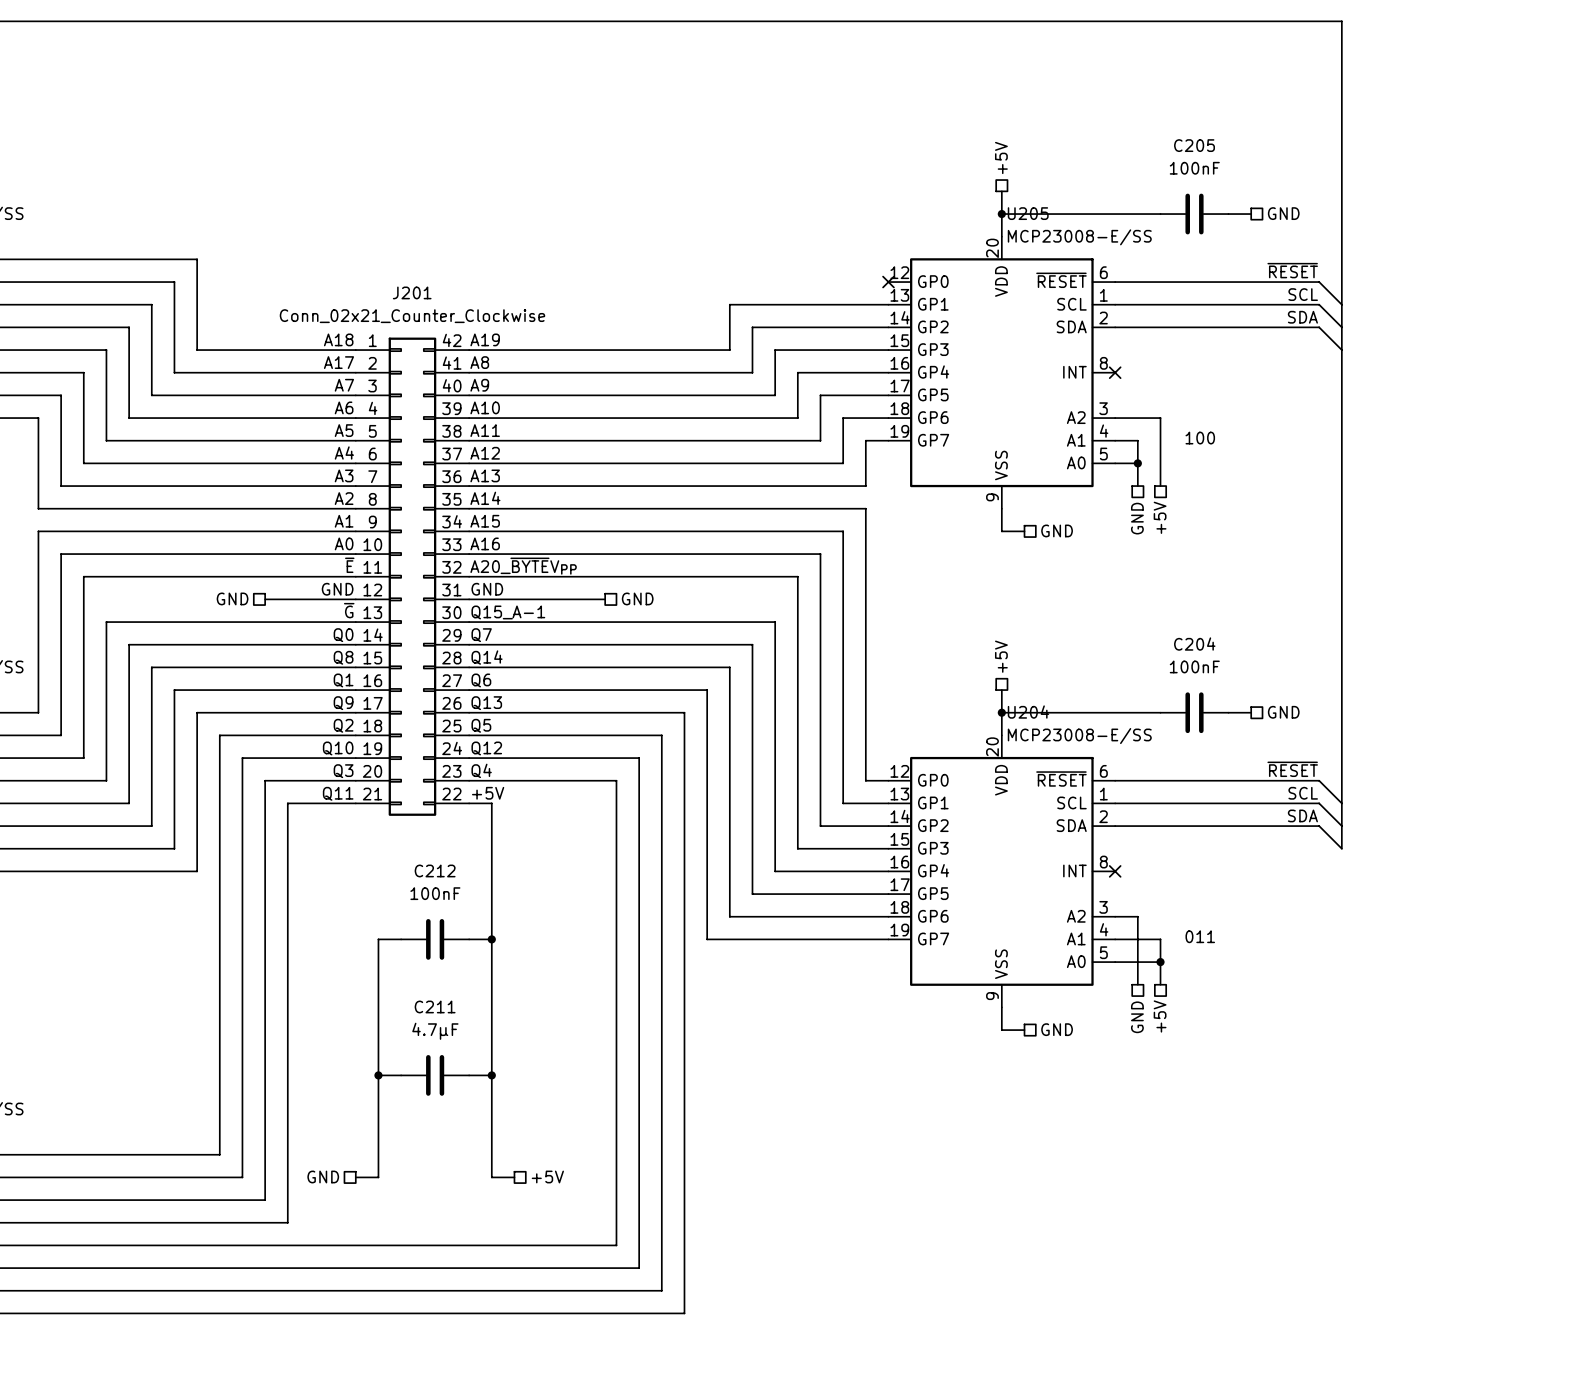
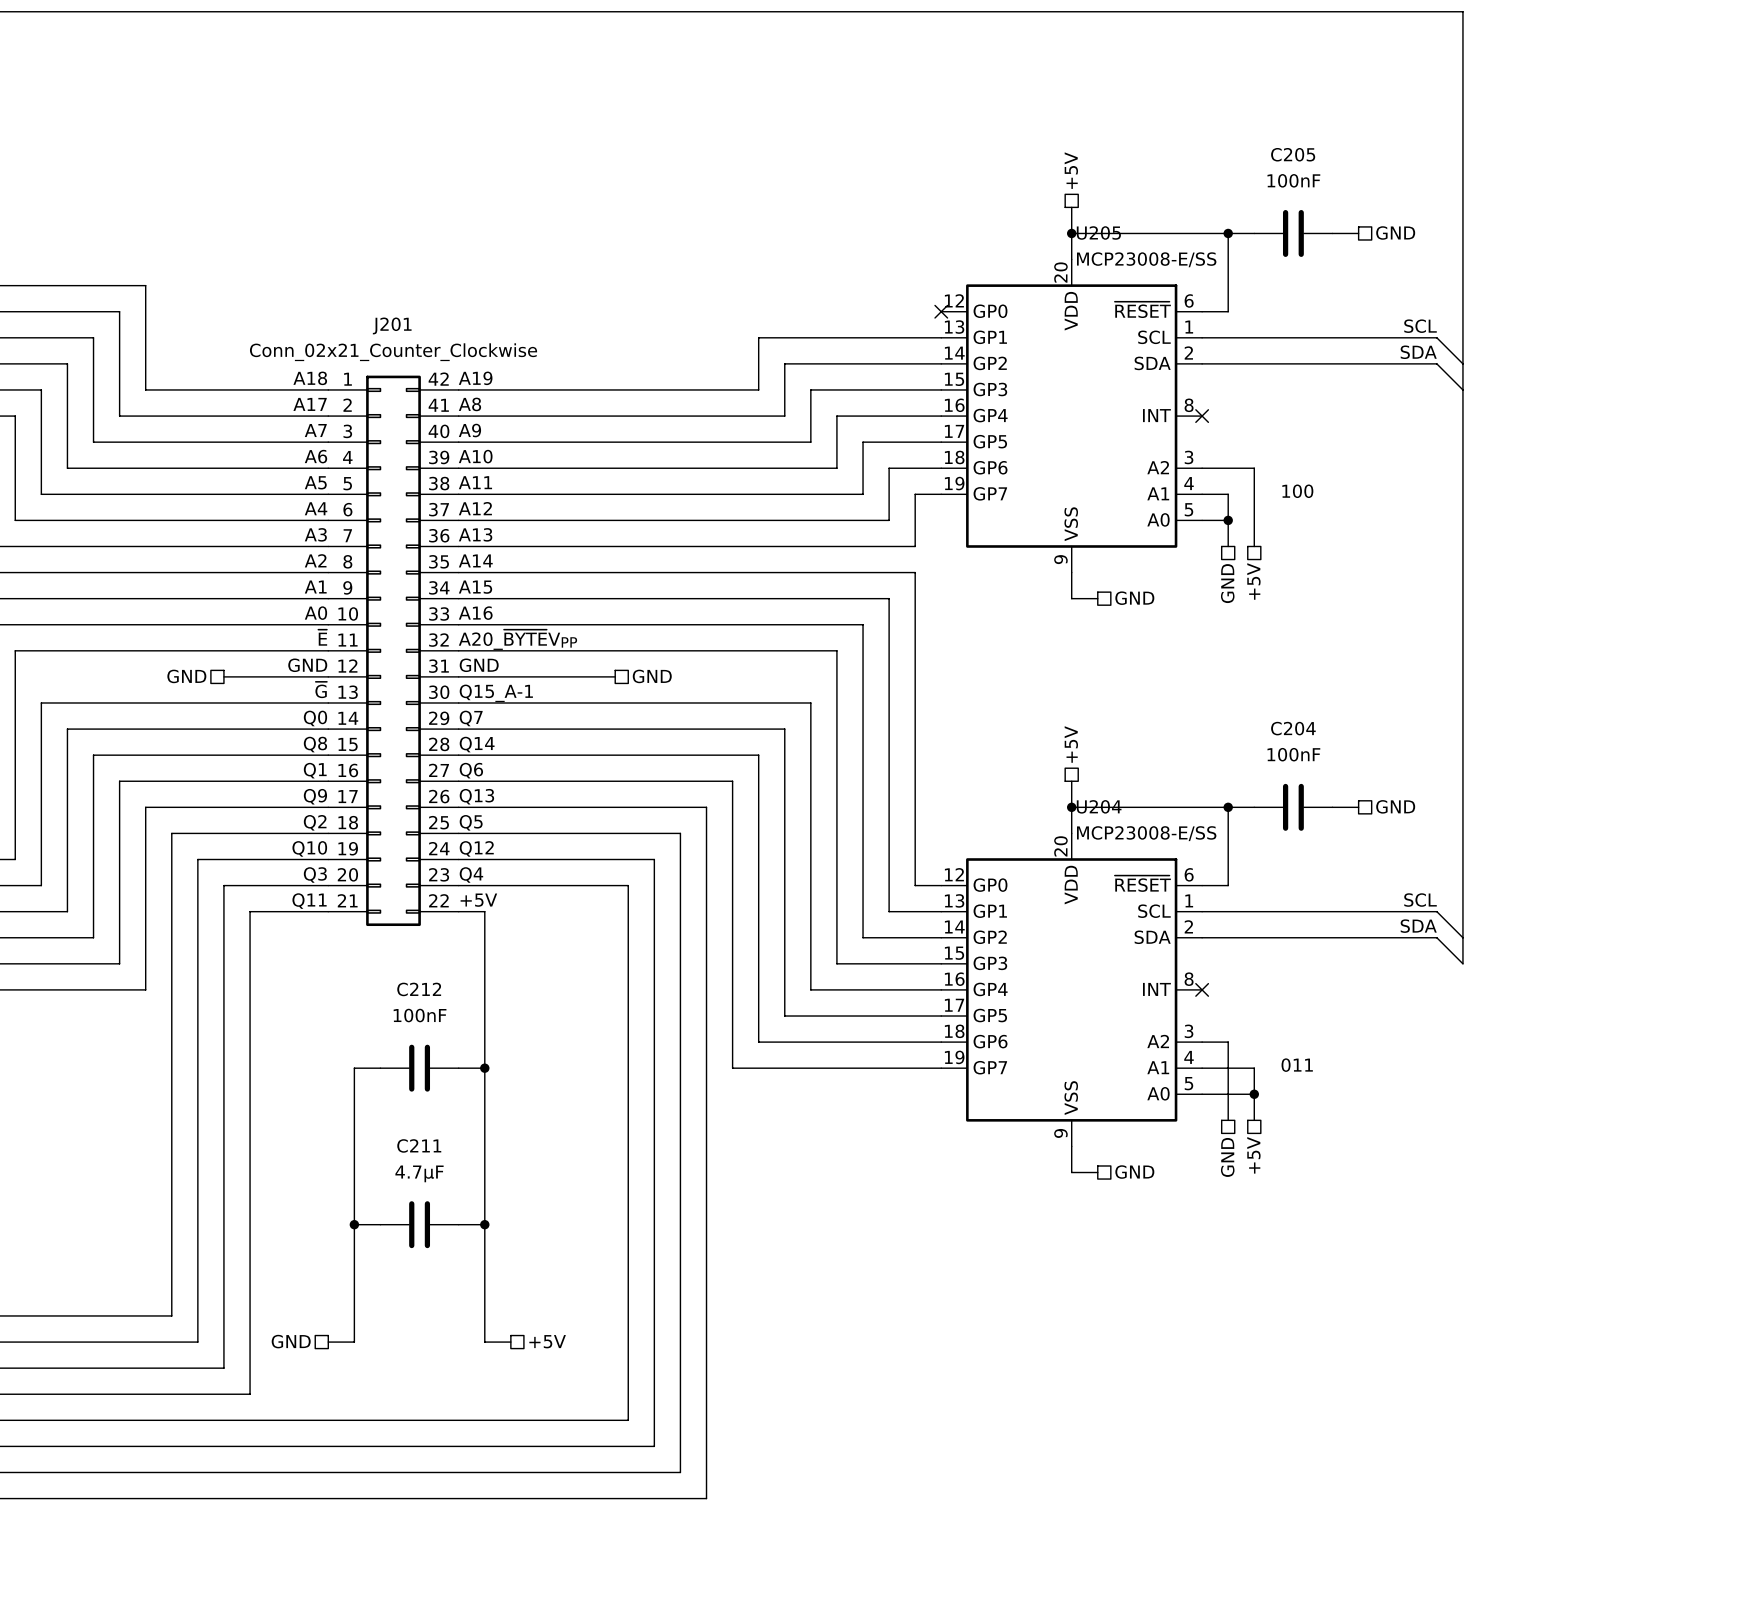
junction: none -> (1228, 233)
label: ~{RESET} (1292, 270) -> none
wire: (1137, 282) (1319, 282) (1341, 304) -> (1228, 311) (1228, 233)
junction: none -> (1228, 807)
label: ~{RESET} (1292, 769) -> none
wire: (1137, 780) (1319, 780) (1341, 803) -> (1228, 885) (1228, 807)

